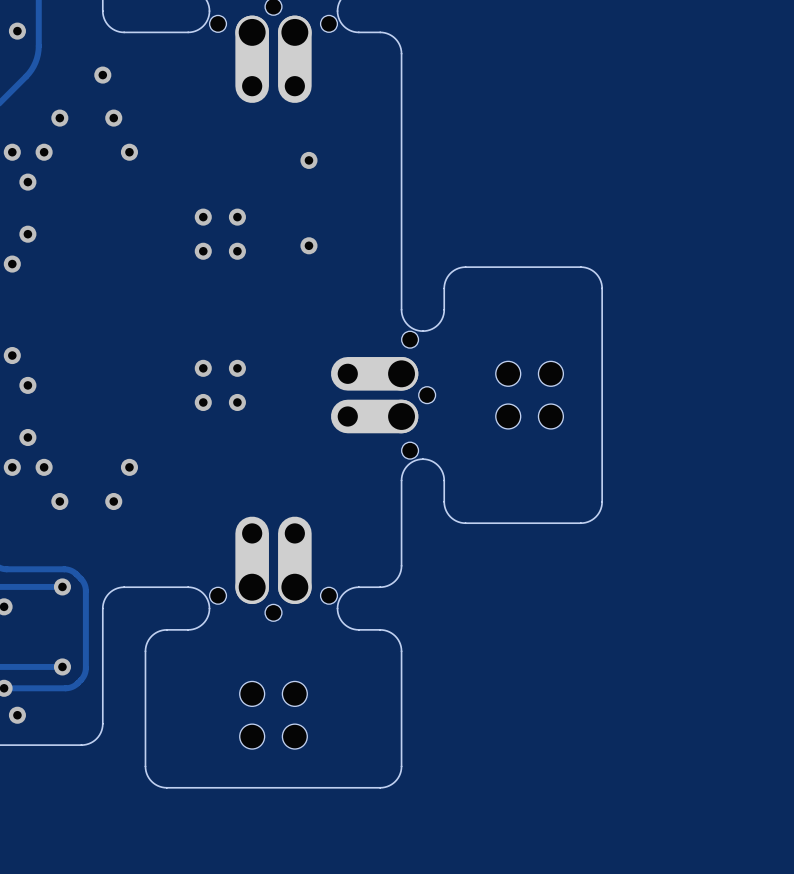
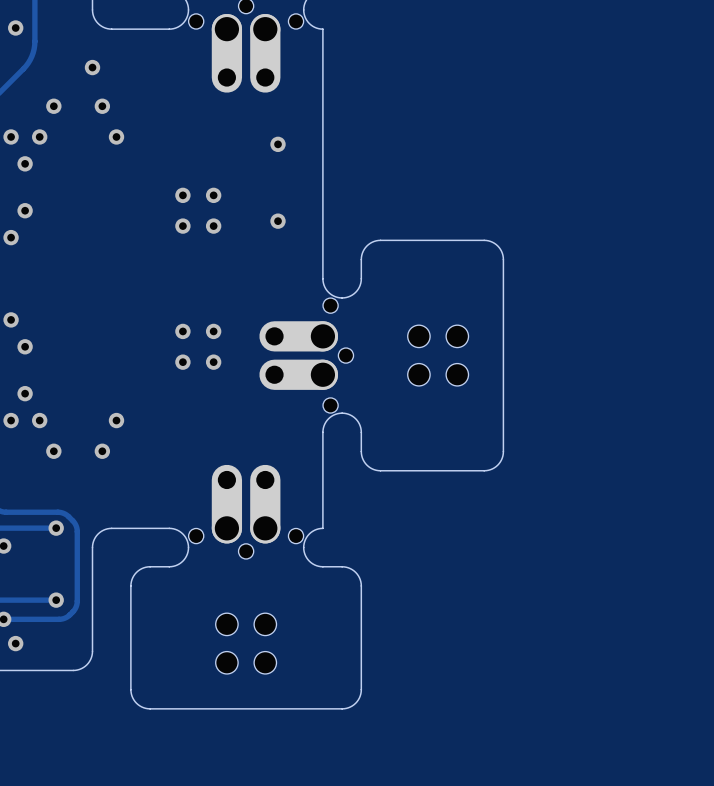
board edge: (358, 32) (382, 32) (389, 34) (396, 40) (401, 51) (401, 288) -> (322, 29) (323, 280) (330, 293) (344, 297) (355, 292) (361, 278)
board edge: (465, 267) (454, 270) (446, 279) (443, 314) (439, 323) (434, 327) (422, 331) (411, 327) (404, 321) (401, 309) -> (418, 240) (374, 241) (365, 247) (361, 259)
board edge: (538, 267) (587, 268) (598, 277) (602, 288) (601, 506) (595, 516) (585, 522) (538, 523) -> (484, 240) (497, 245) (503, 259) (503, 453) (496, 466) (484, 470)
part: none -> (298, 336)
part: (374, 373) -> none
part position: (418, 395) -> (338, 355)
part position: (529, 395) -> (438, 355)
part: none -> (298, 374)
part: (374, 416) -> none
board edge: (401, 480) (403, 471) (411, 462) (422, 459) (434, 462) (439, 467) (443, 475) (446, 511) (454, 519) (465, 523) -> (361, 451) (365, 463) (374, 469) (418, 470)
board edge: (401, 501) (401, 565) (399, 575) (393, 582) (387, 586) (358, 587) -> (361, 432) (357, 420) (346, 413) (331, 416) (323, 426) (322, 528)

